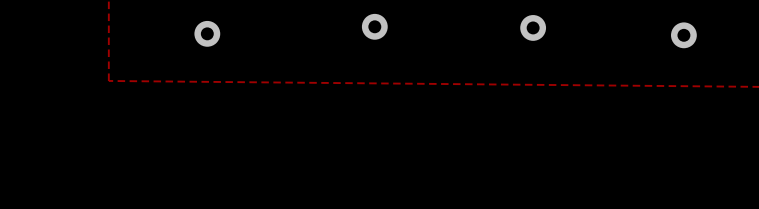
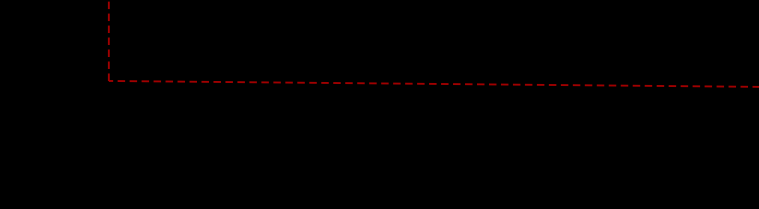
via: (374, 26) -> none
via: (533, 27) -> none
via: (207, 33) -> none
via: (683, 35) -> none

